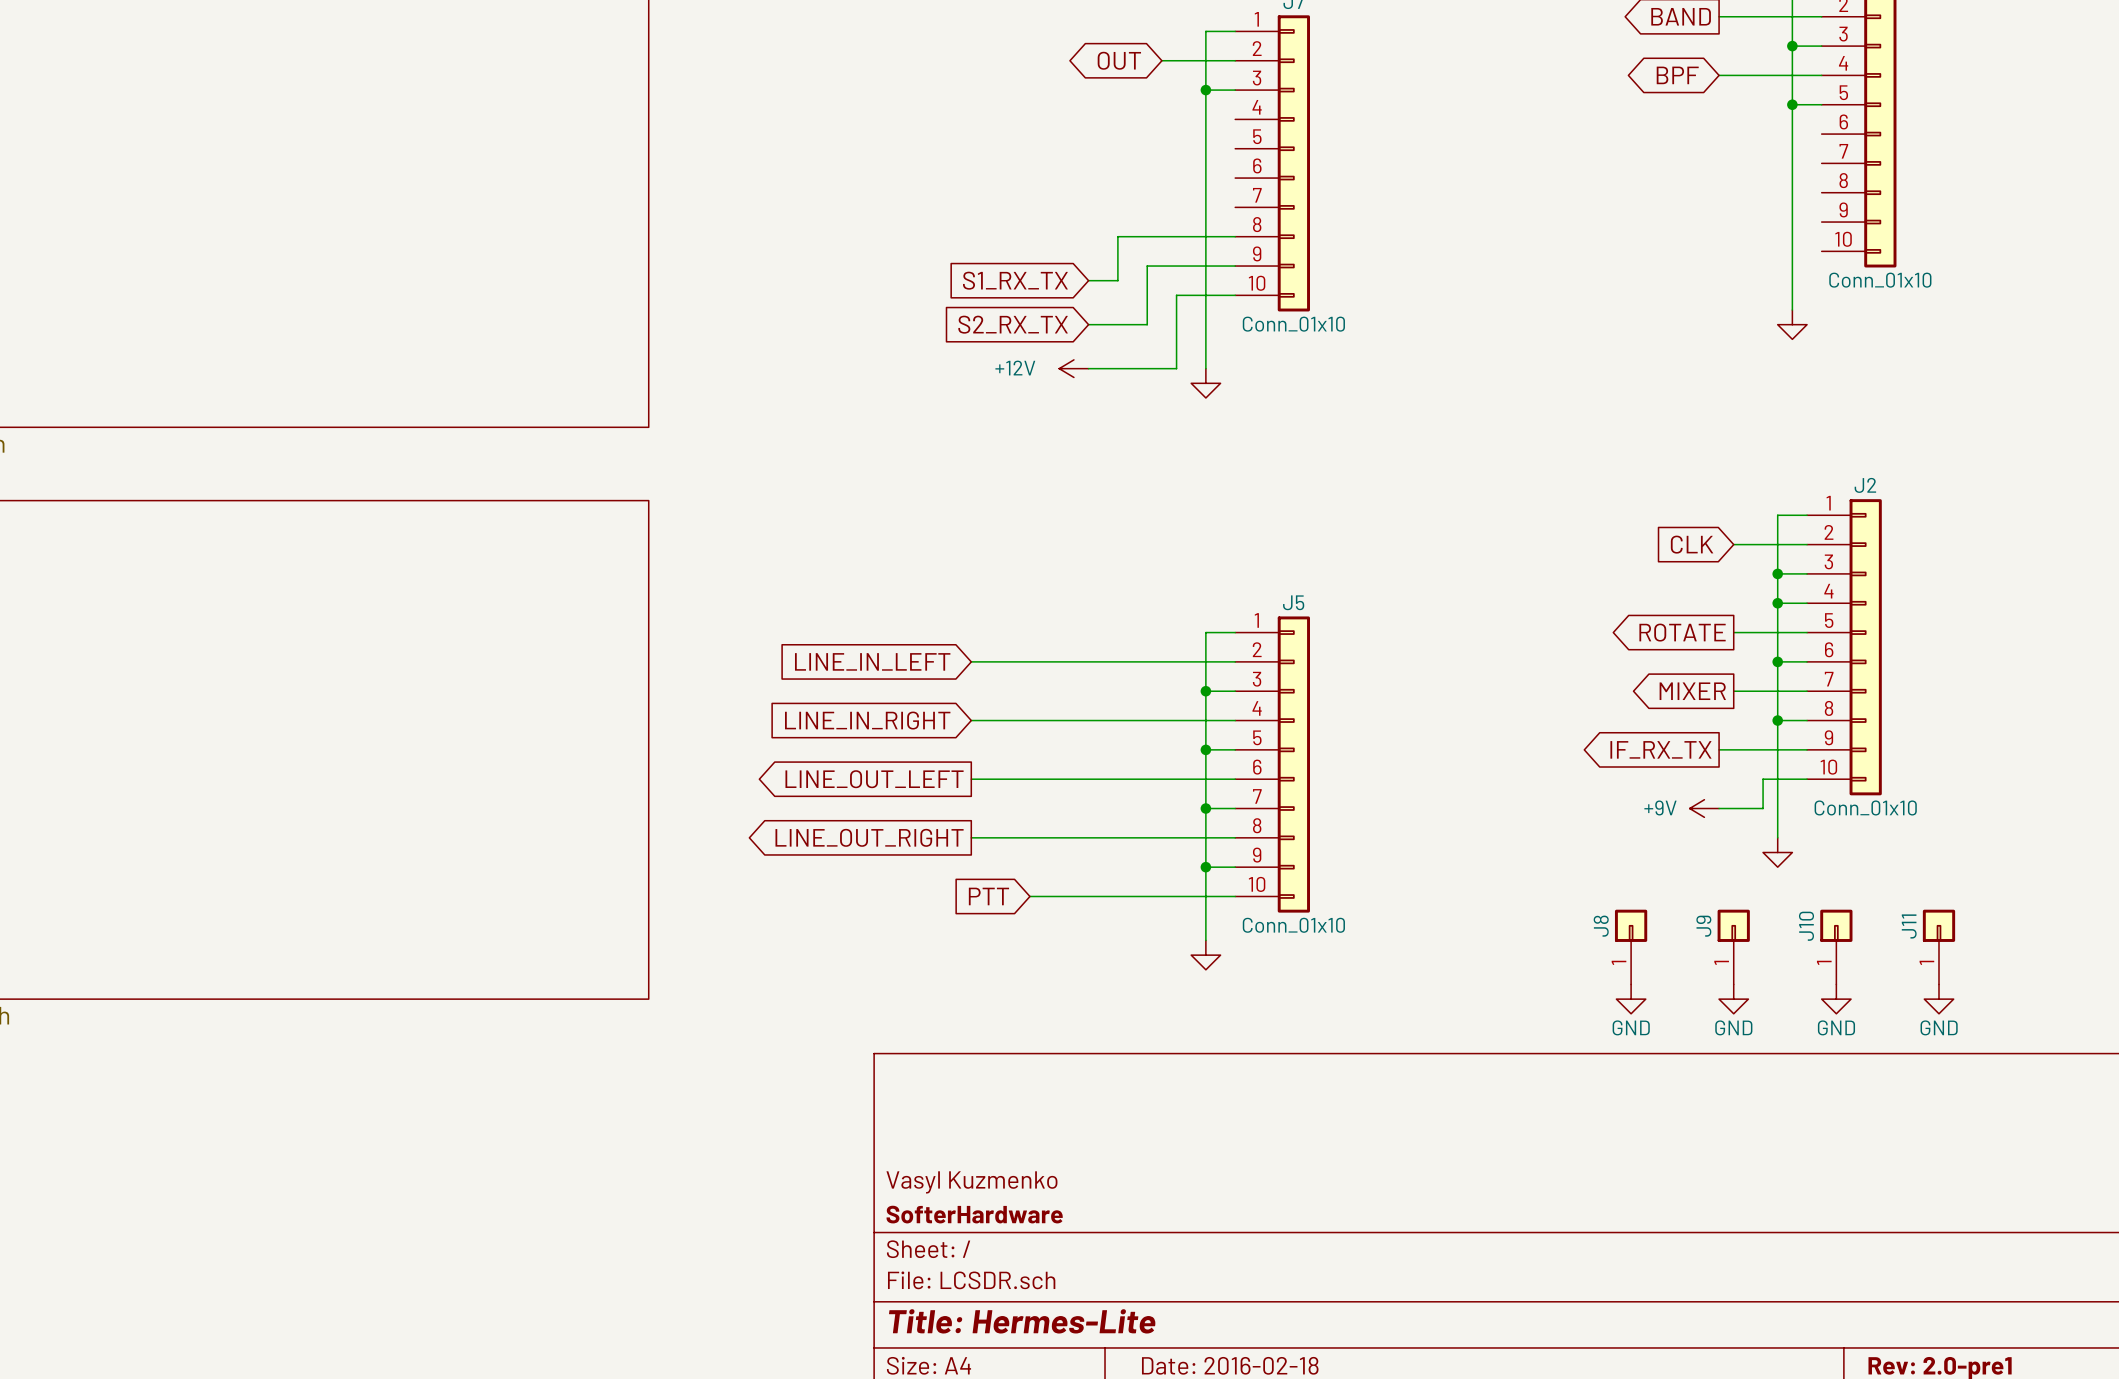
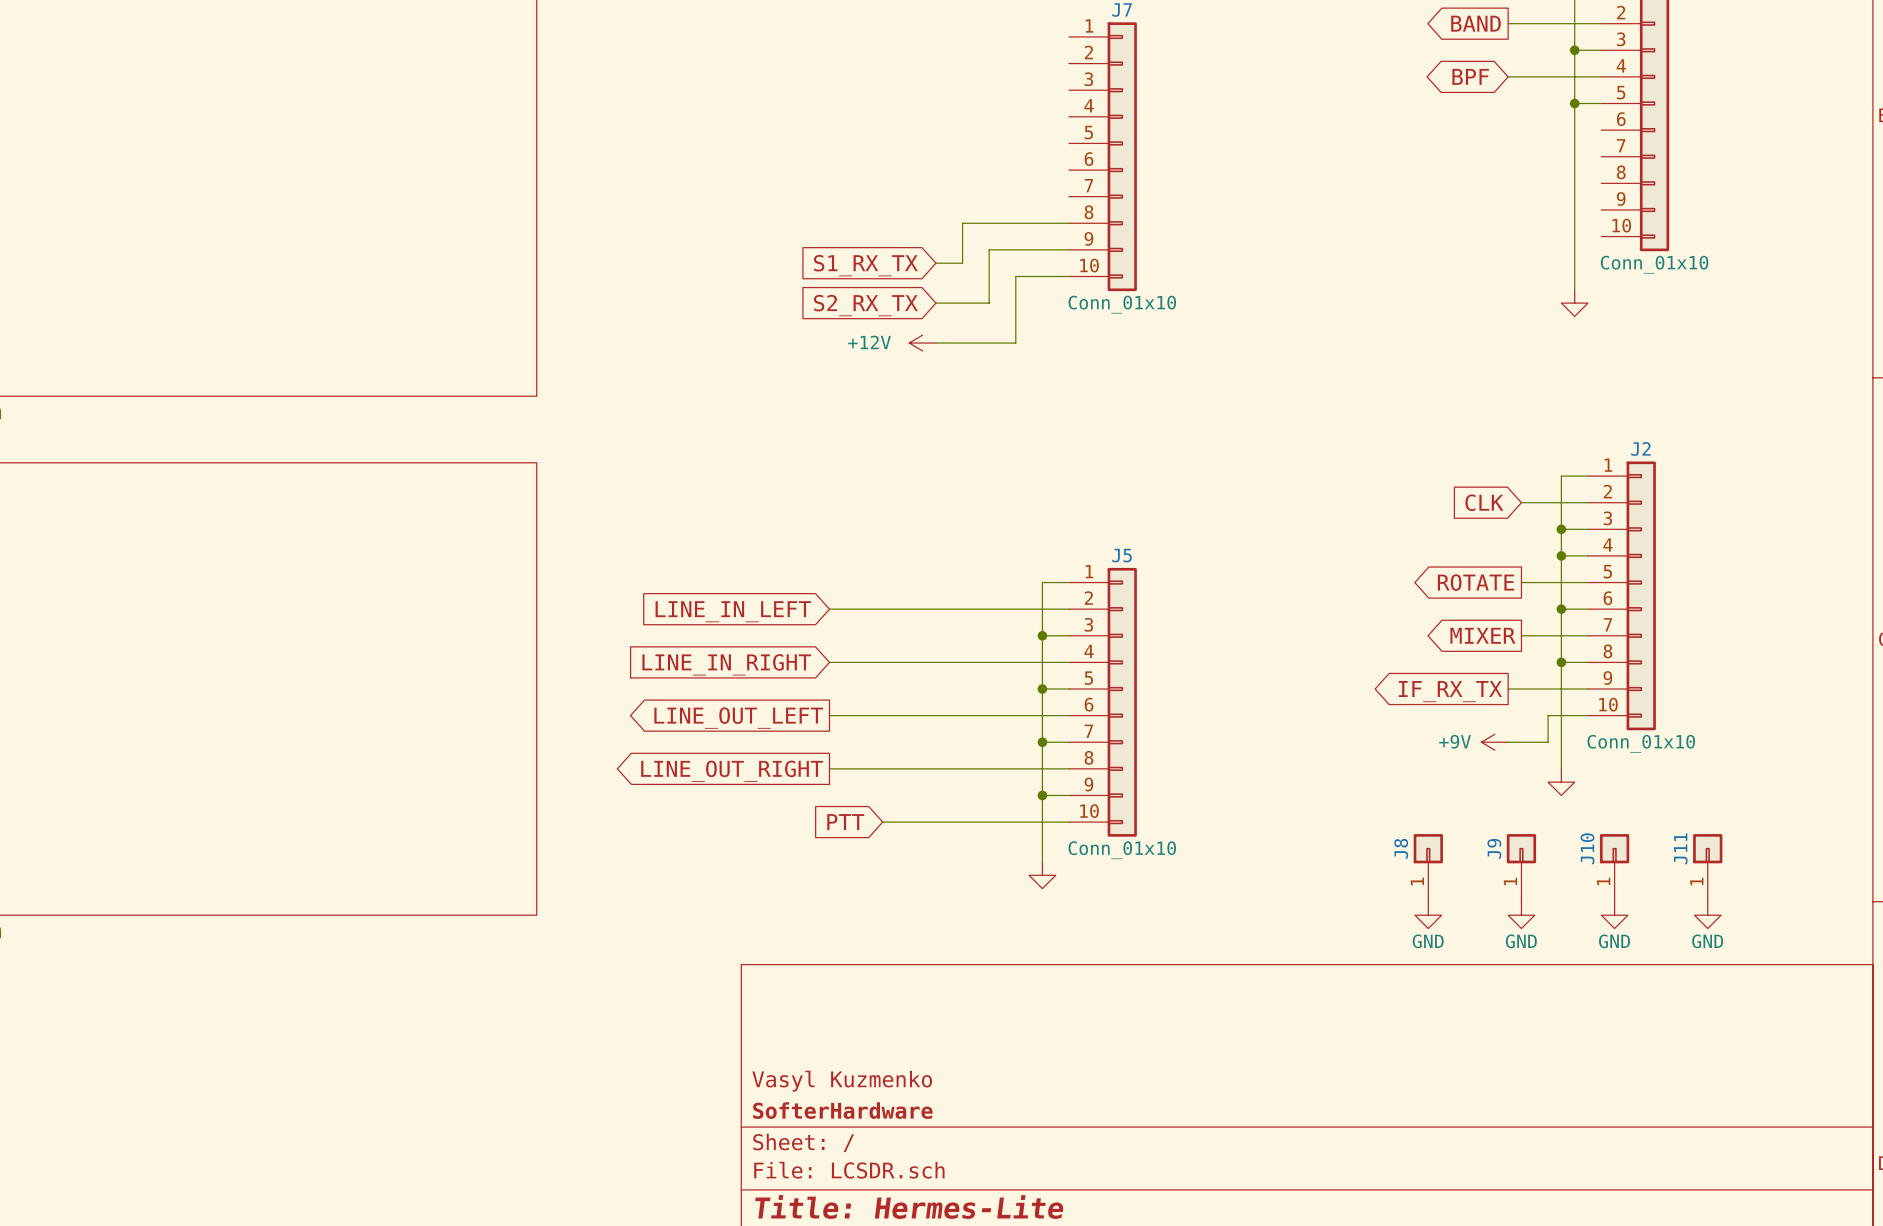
wire: (1235, 31) (1205, 31) (1205, 368) -> none
global label: OUT (1119, 60) -> none
wire: (1161, 60) (1235, 60) -> none
wire: (1205, 90) (1235, 90) -> none
junction: (1205, 90) -> none
power symbol: (1205, 383) -> none

